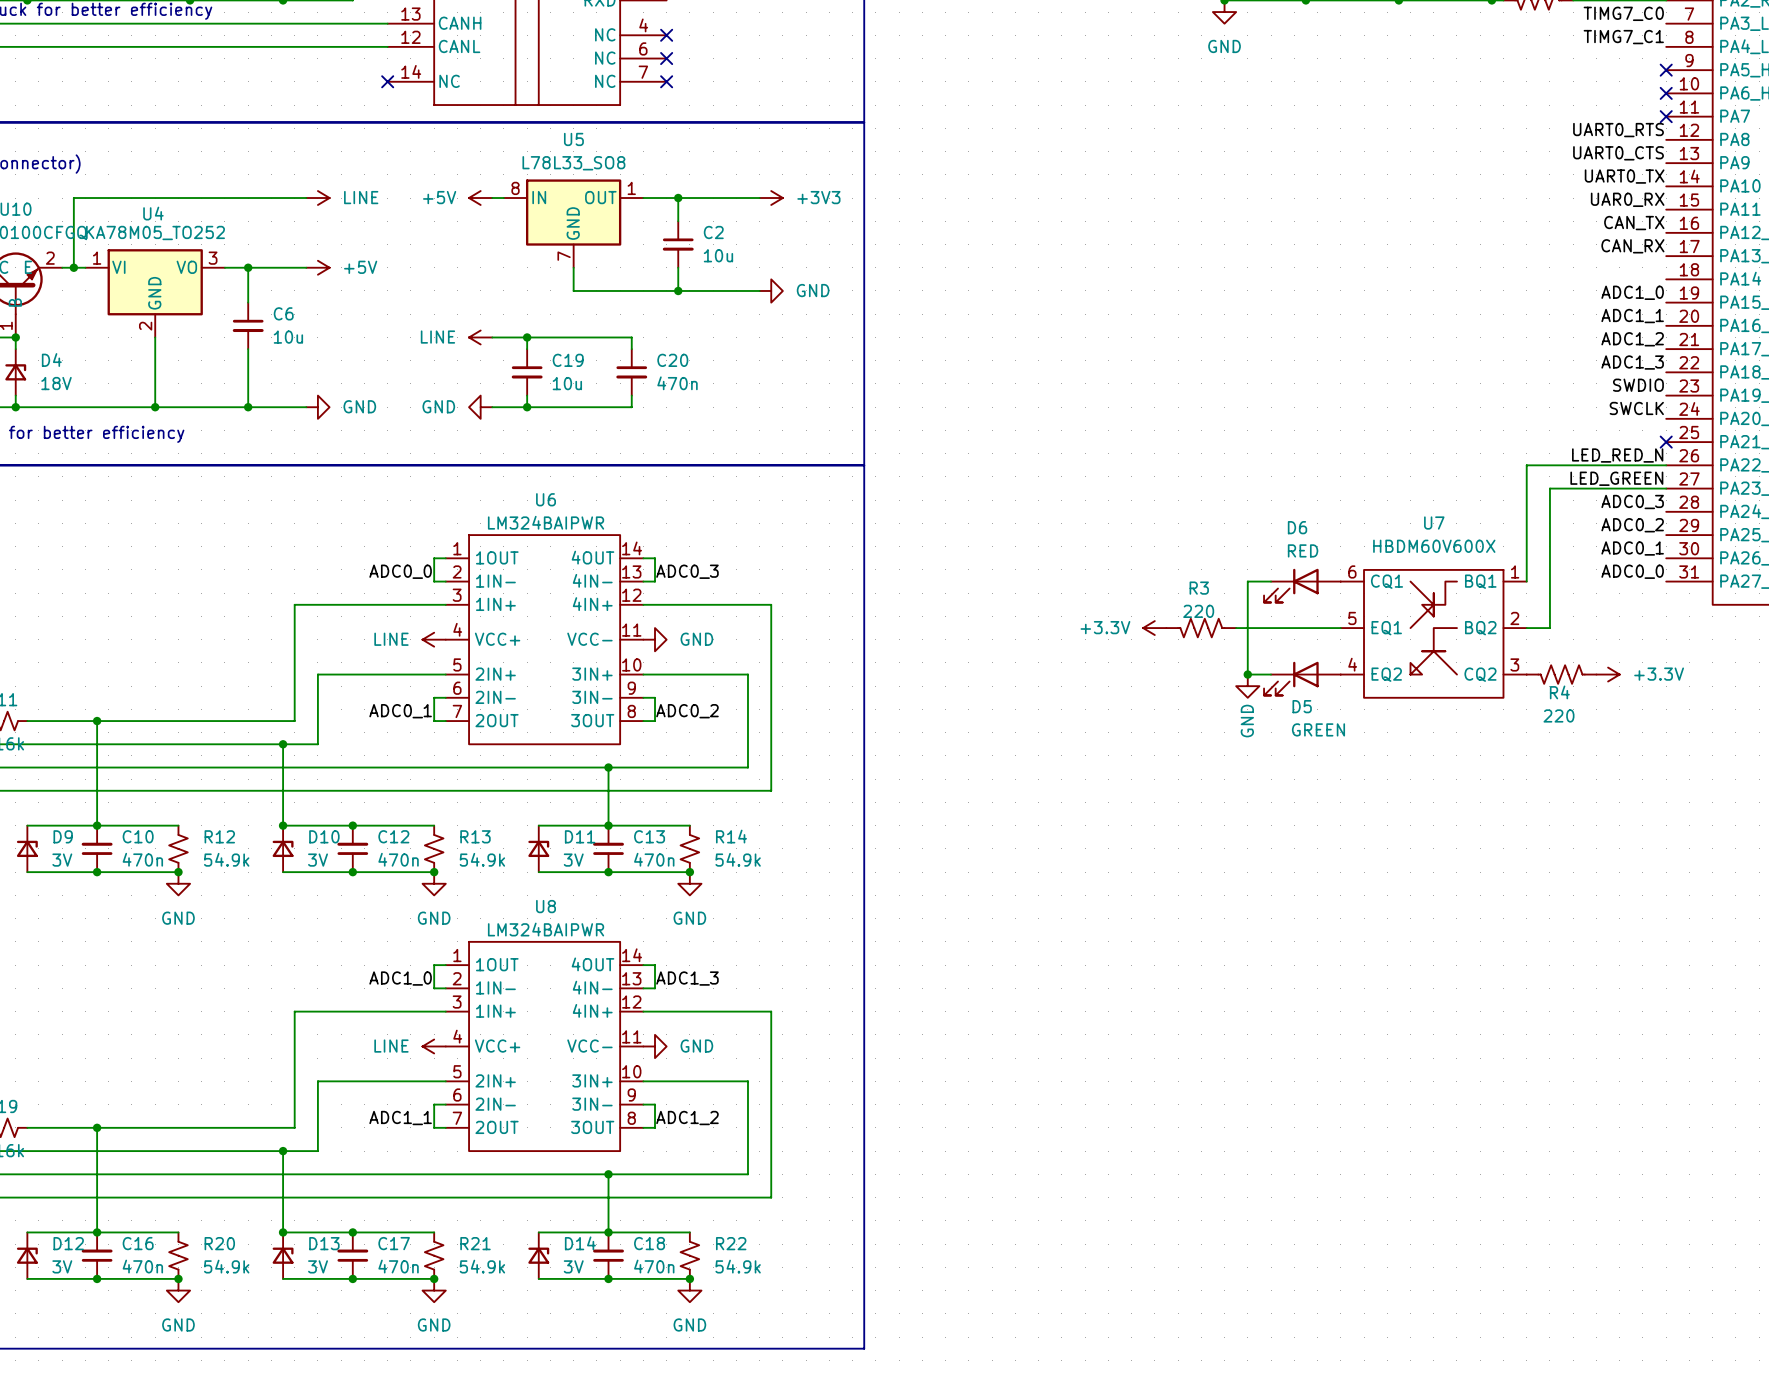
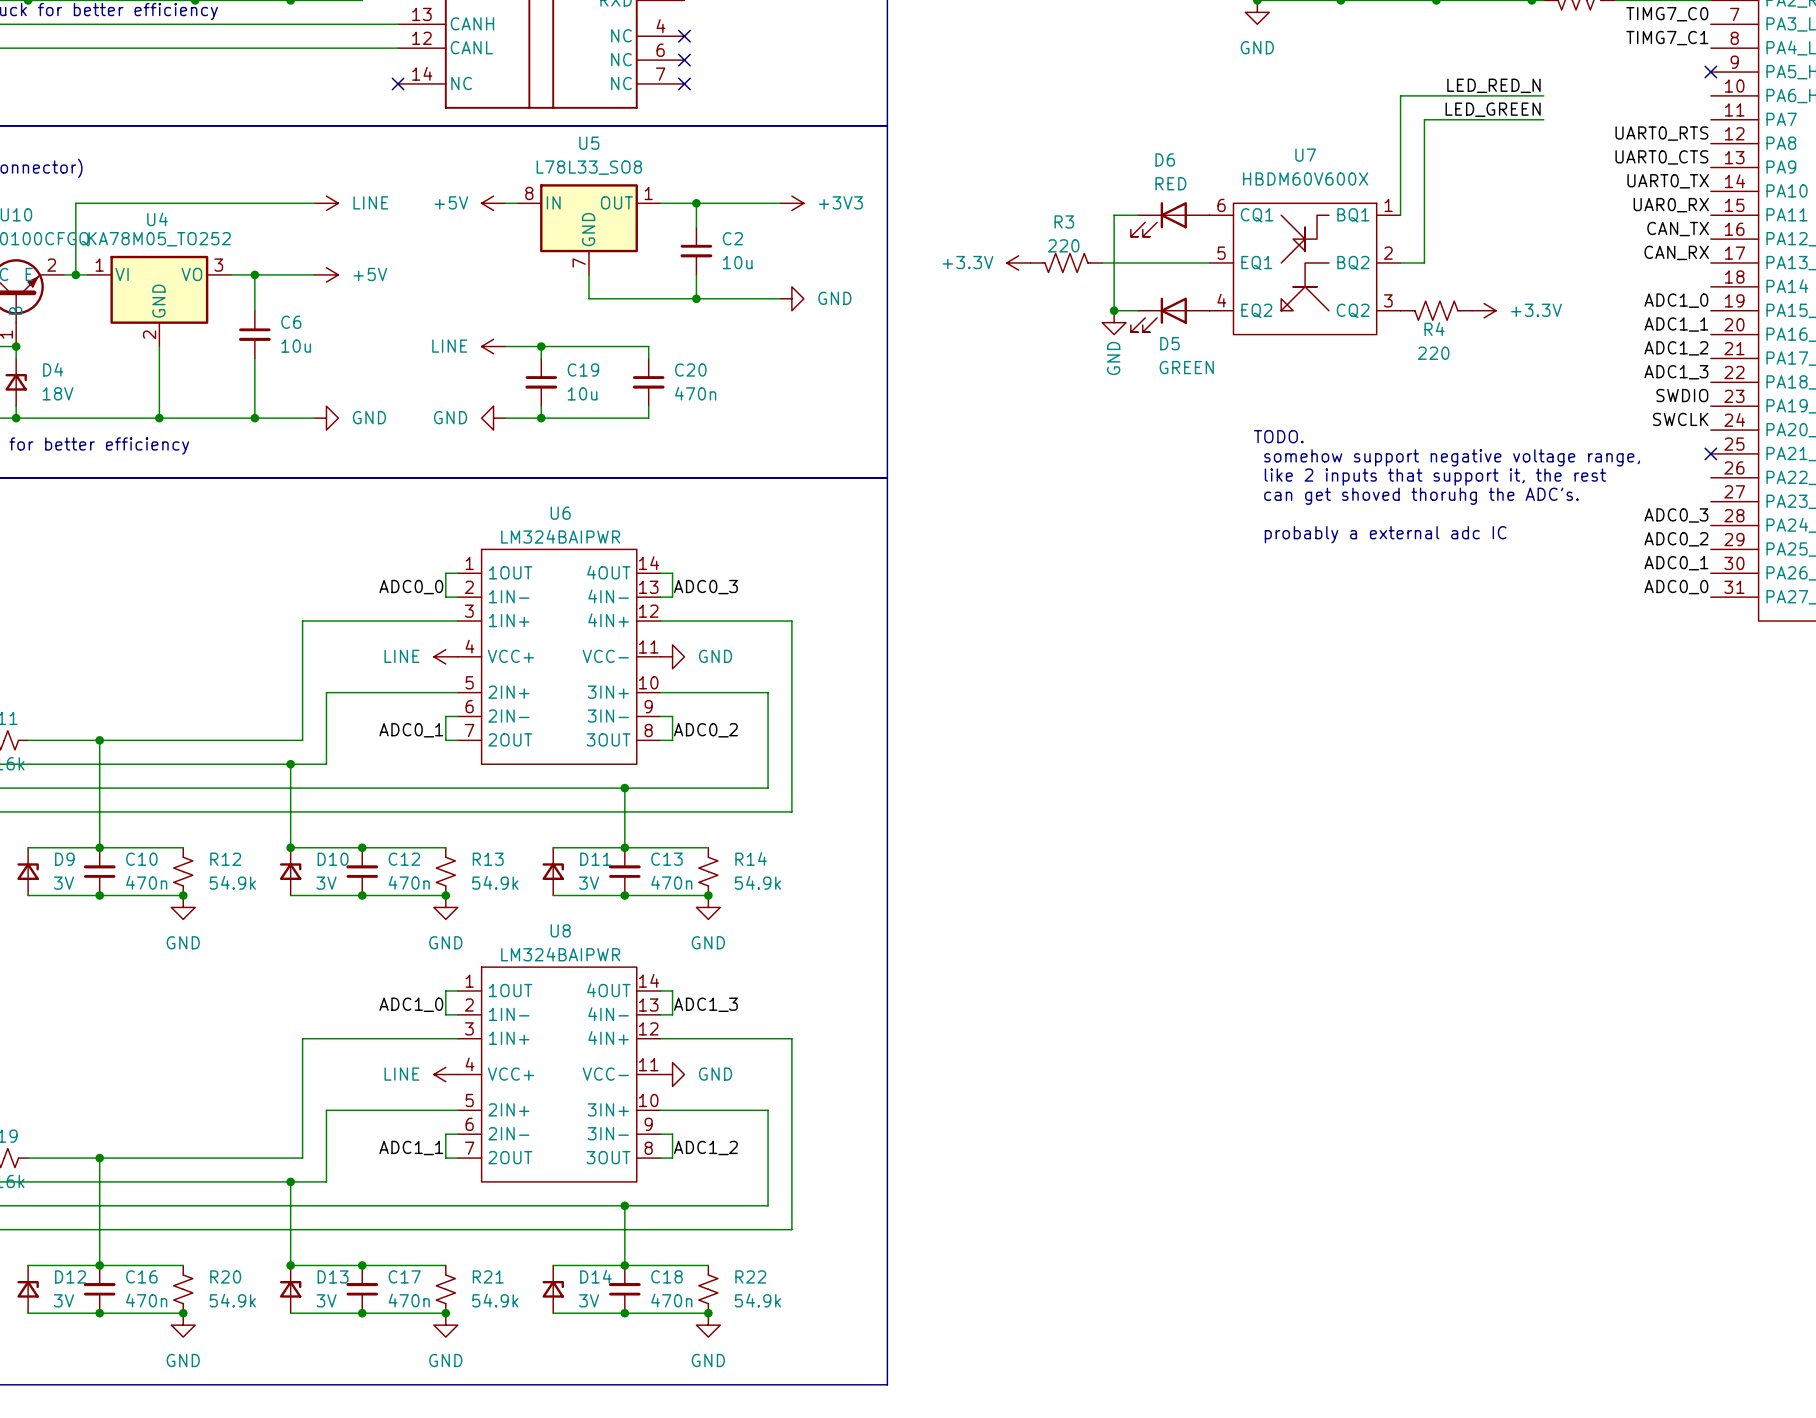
label: none -> LED_RED_N (1493, 85)
wire: none -> (1543, 95) (1400, 95) (1400, 215)
no-connect mark: (1666, 93) -> none
label: none -> LED_GREEN (1493, 109)
wire: none -> (1543, 119) (1424, 119) (1424, 262) (1400, 262)
no-connect mark: (1666, 116) -> none
wire: none -> (1138, 215) (1114, 215) (1114, 310) (1138, 310)
power symbol: none -> +3.3V (1018, 262)
wire: none -> (1102, 262) (1209, 262)
junction: none -> (1114, 310)
power symbol: none -> +3.3V (1484, 310)
power symbol: none -> GND (1114, 322)
text: none -> TODO. (1278, 436)
text: none -> somehow support negative voltage range, (1452, 457)
label: LED_RED_N (1617, 455) -> none
text: none -> like 2 inputs that support it, the rest (1435, 477)
wire: (1666, 465) (1526, 465) (1526, 581) -> none
label: LED_GREEN (1616, 478) -> none
text: none -> can get shoved thoruhg the ADC's. (1421, 496)
wire: (1666, 488) (1549, 488) (1549, 628) (1526, 628) -> none
text: none -> probably a external adc IC (1385, 534)
wire: (1271, 581) (1247, 581) (1247, 674) (1271, 674) -> none
D6 position: (1302, 585) -> (1170, 219)
power symbol: +3.3V (1154, 628) -> none
R3 position: (1201, 628) -> (1066, 262)
wire: (1236, 628) (1340, 628) -> none
U7 position: (1433, 633) -> (1305, 268)
junction: (1247, 674) -> none
R4 position: (1561, 674) -> (1436, 310)
power symbol: +3.3V (1608, 674) -> none
D5 position: (1302, 678) -> (1170, 314)
power symbol: GND (1247, 686) -> none

